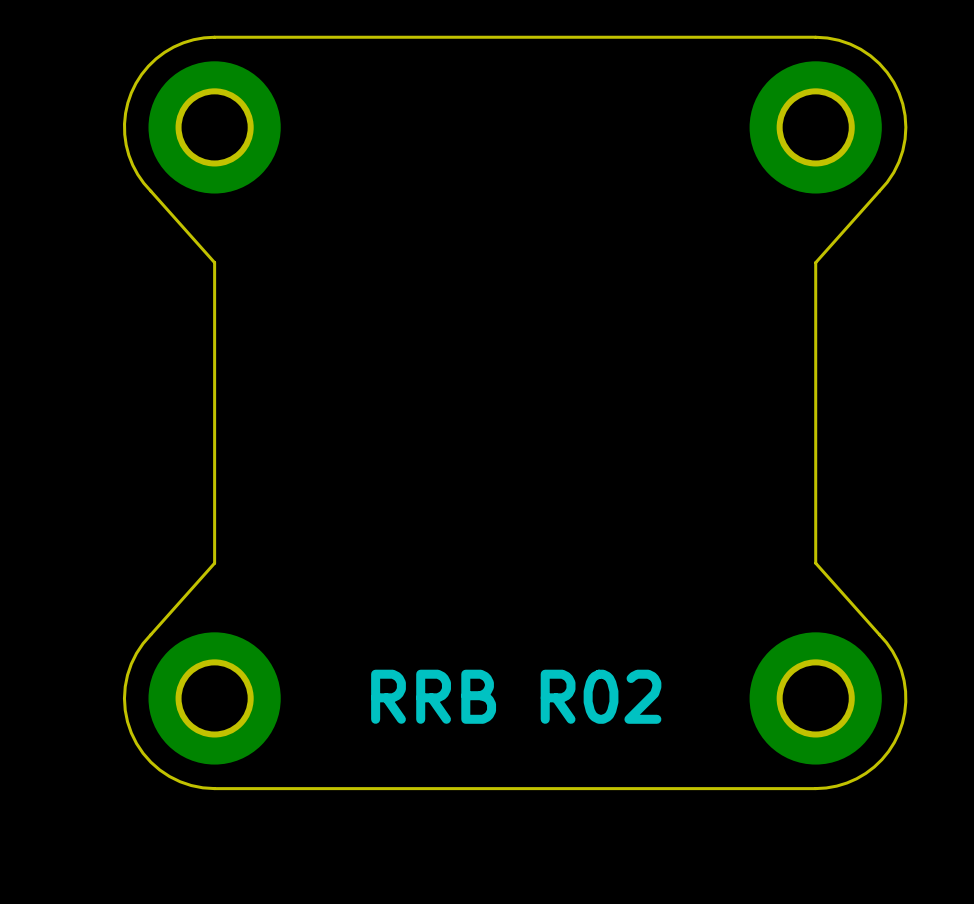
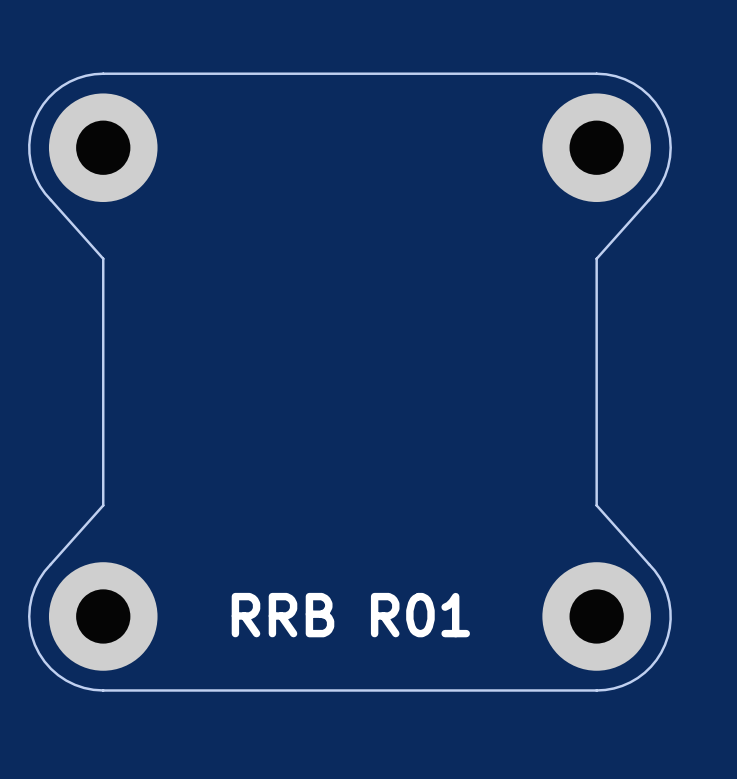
text: RRB R02 (516, 696) -> RRB R01 (350, 615)

